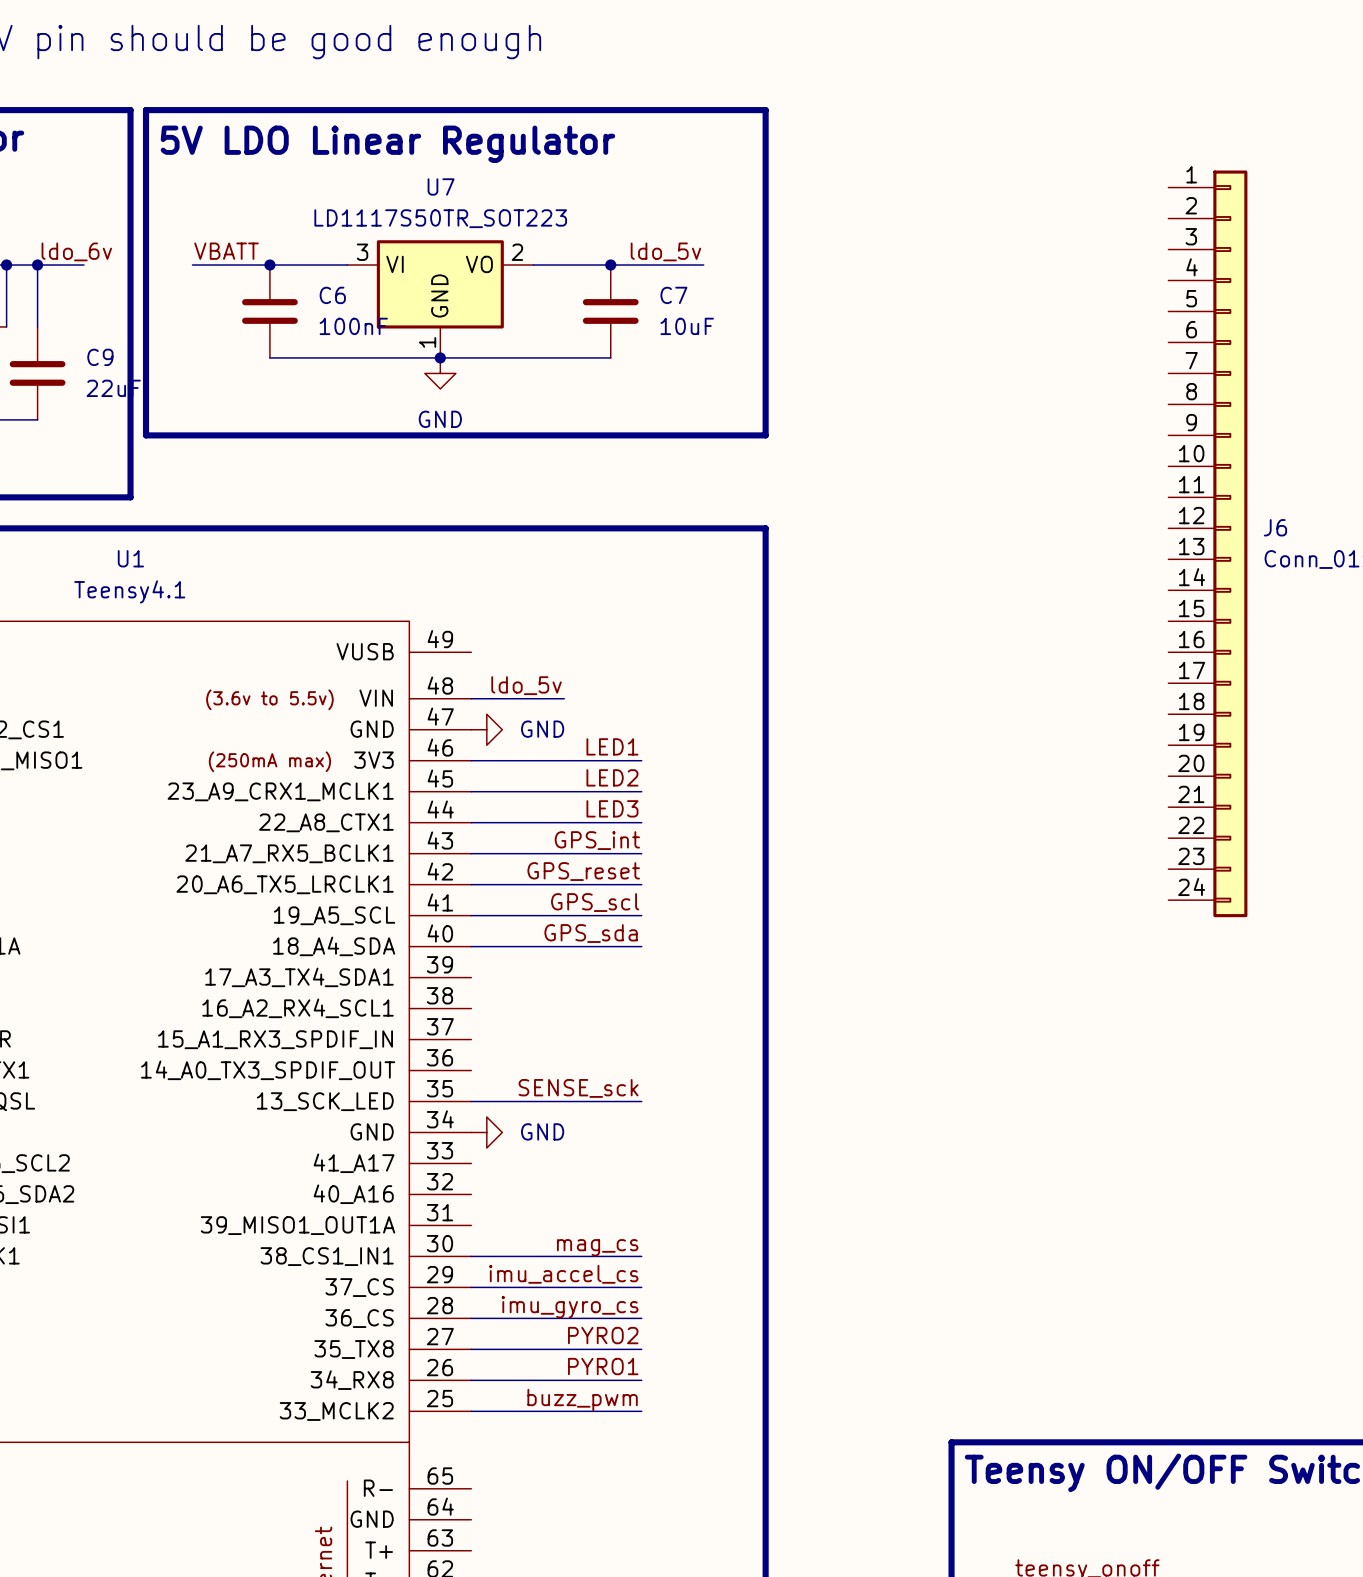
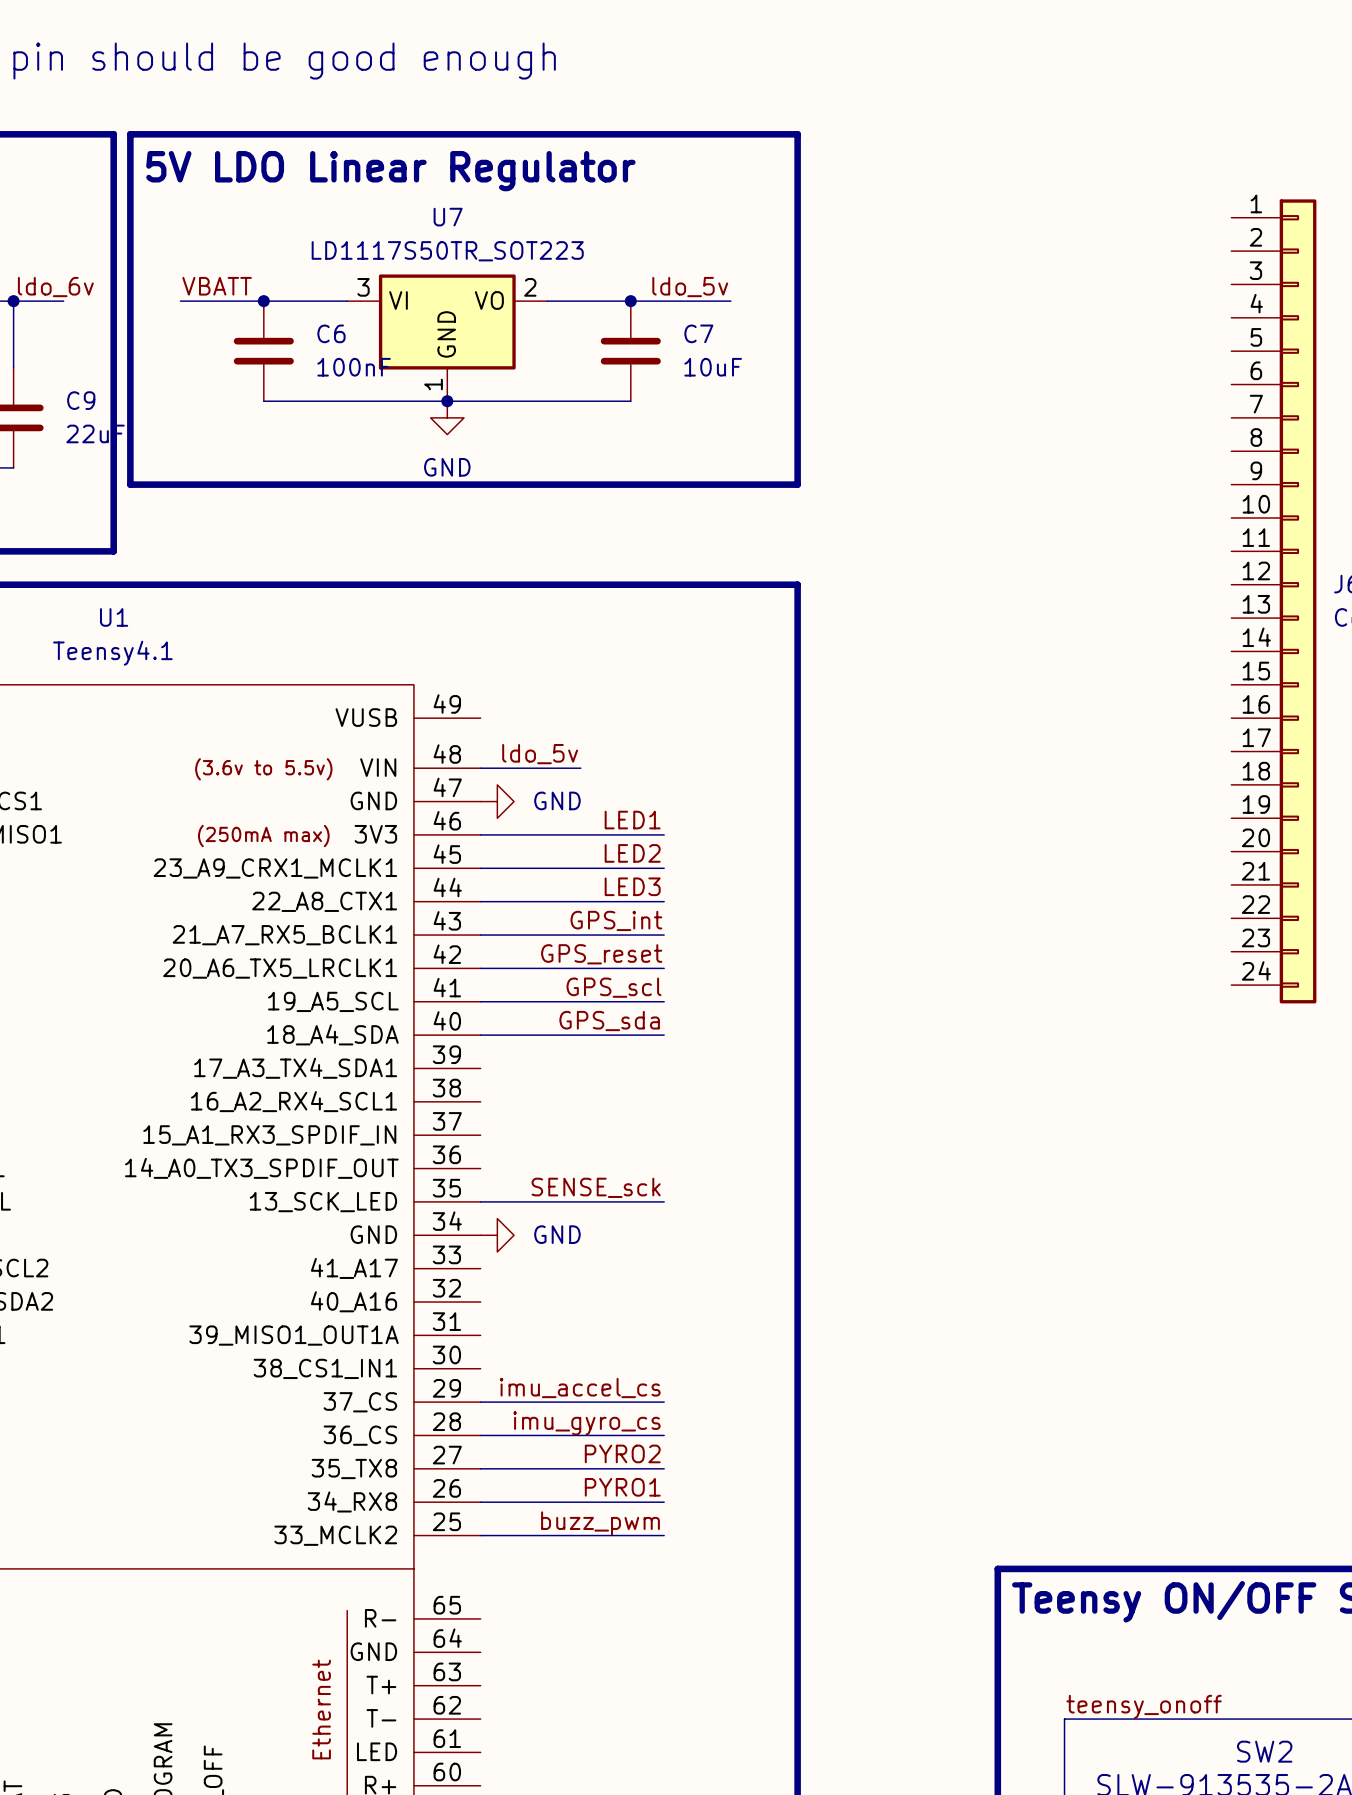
label: mag_cs (597, 1247) -> none
wire: (471, 1256) (641, 1256) -> none

